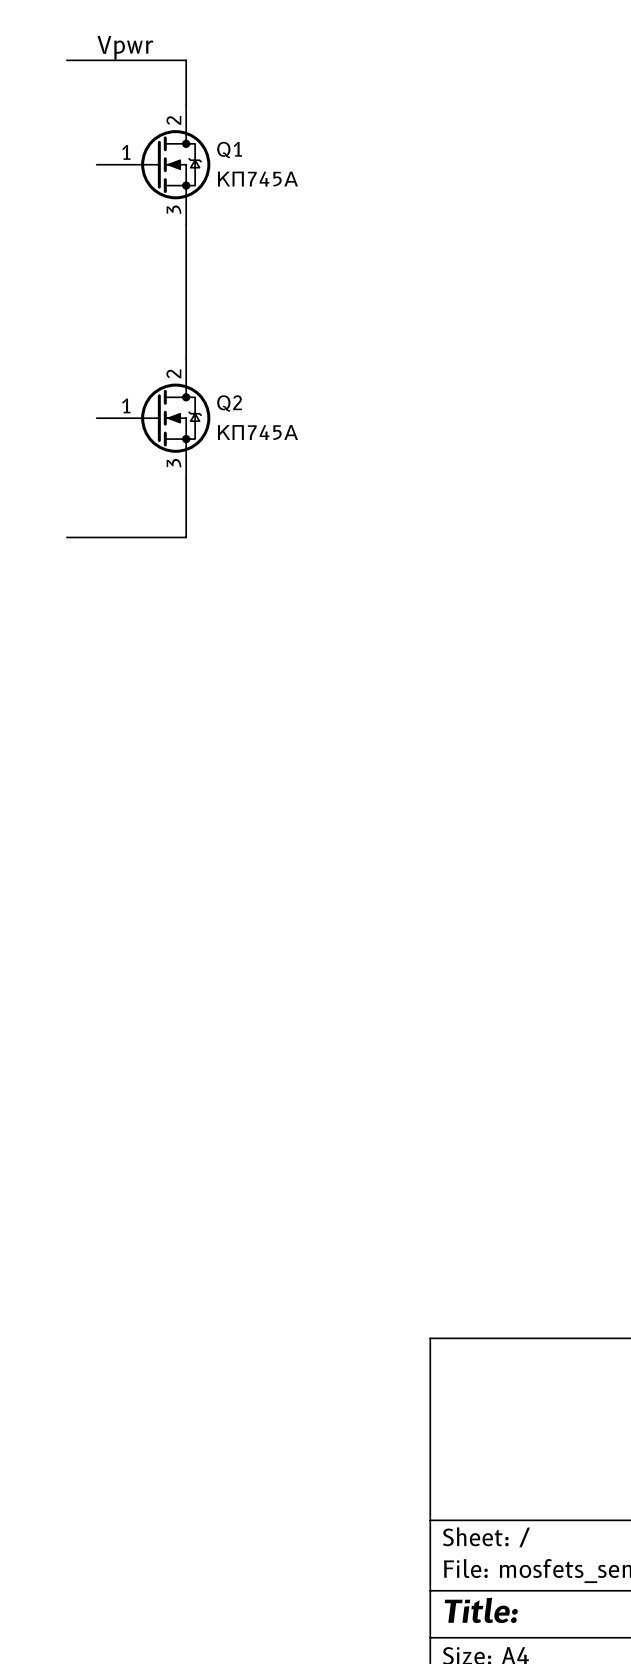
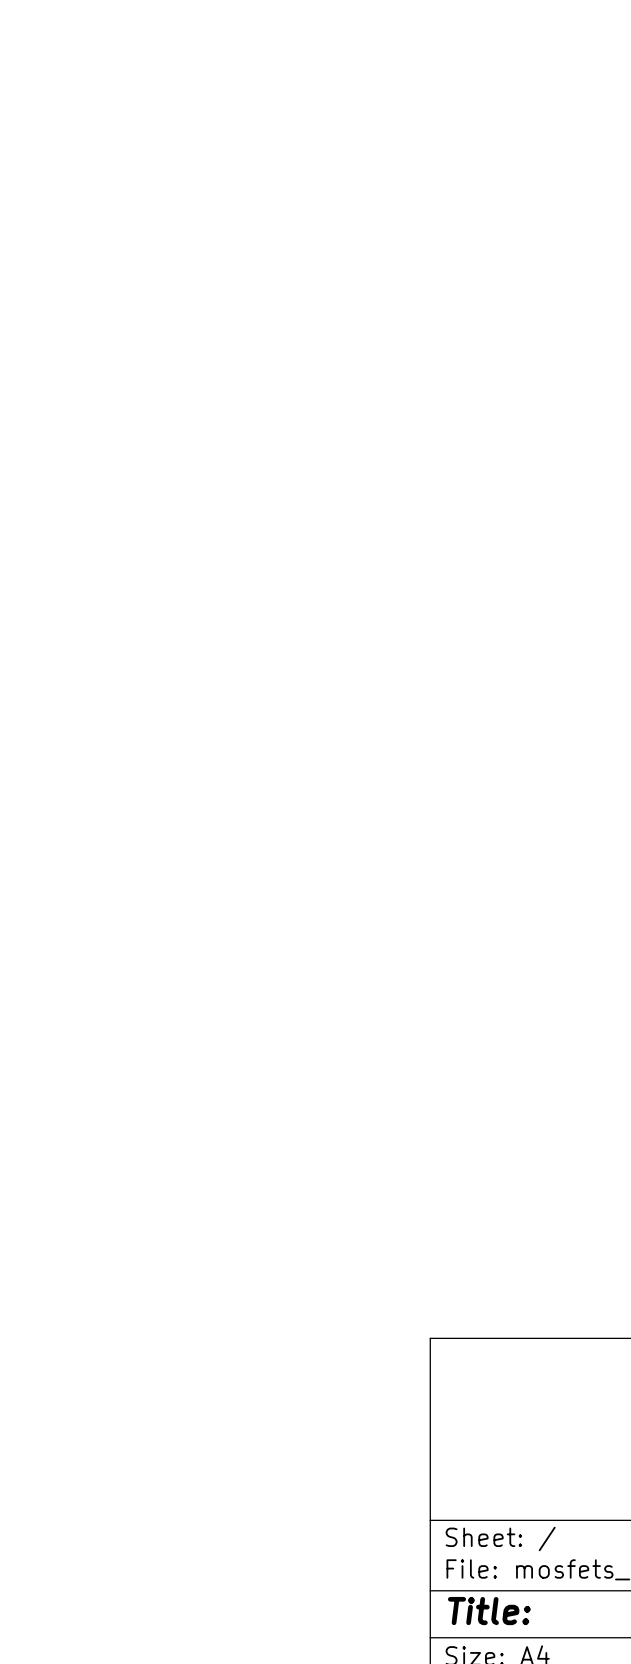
label: Vpwr (125, 47) -> none
wire: (66, 60) (186, 60) (186, 105) -> none
Q1: КП745А (153, 164) -> none
wire: (186, 224) (186, 358) -> none
Q2: КП745А (153, 418) -> none
wire: (186, 477) (186, 537) (66, 537) -> none

